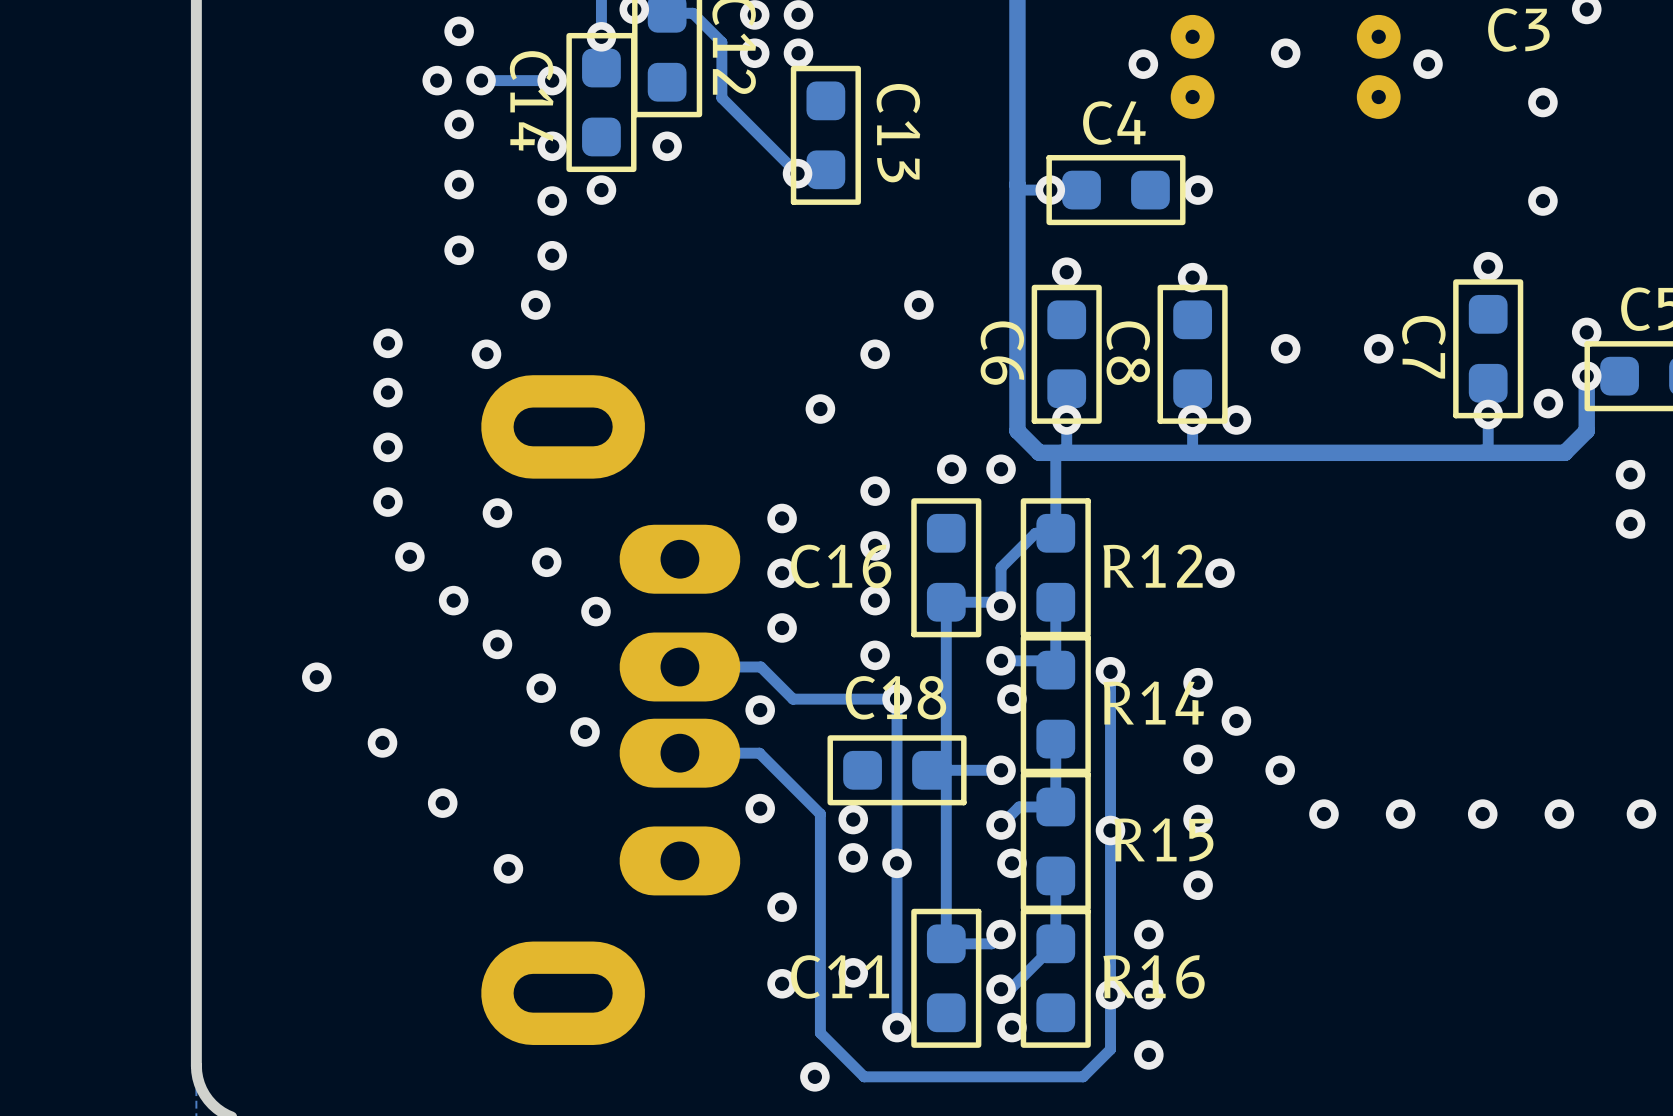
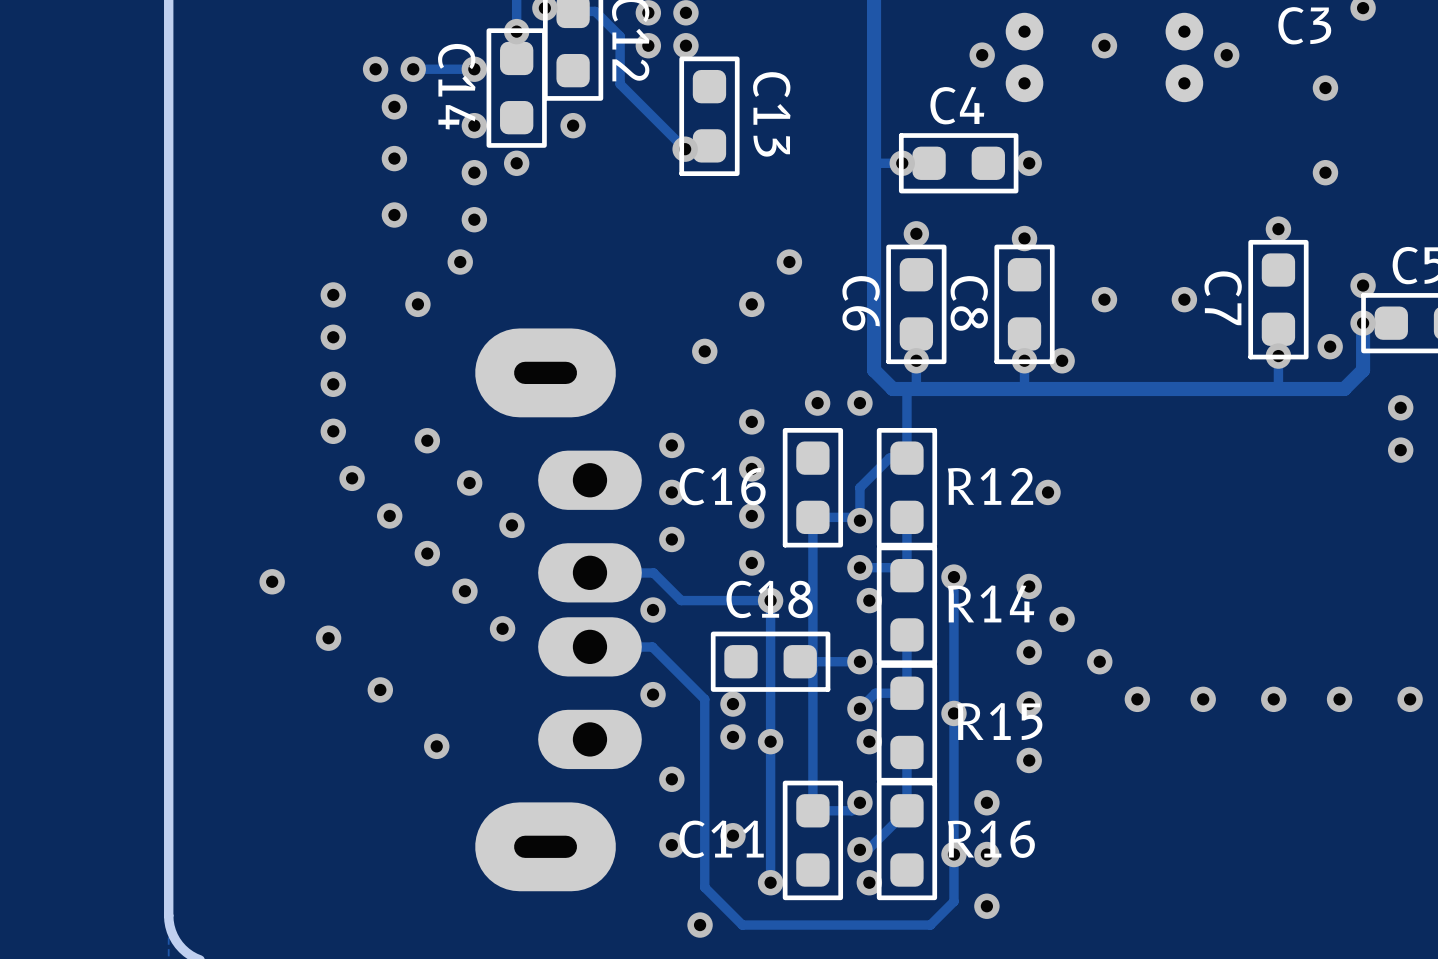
via: (459, 31) -> none
part footprint: [481, 375, 741, 1045] -> [475, 328, 642, 892]

